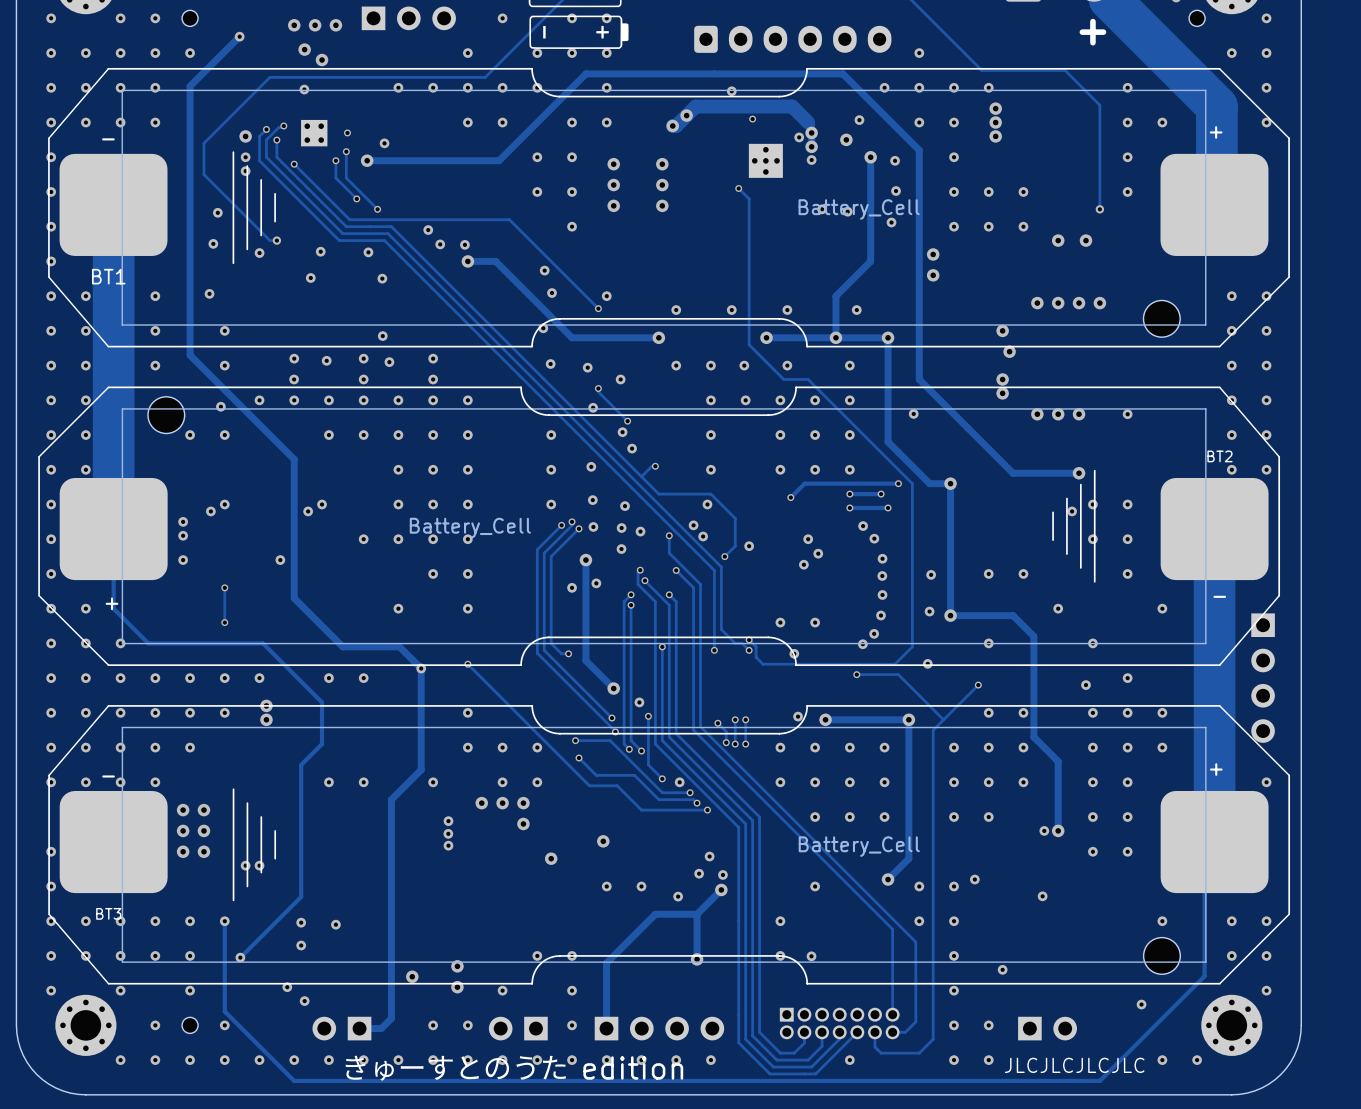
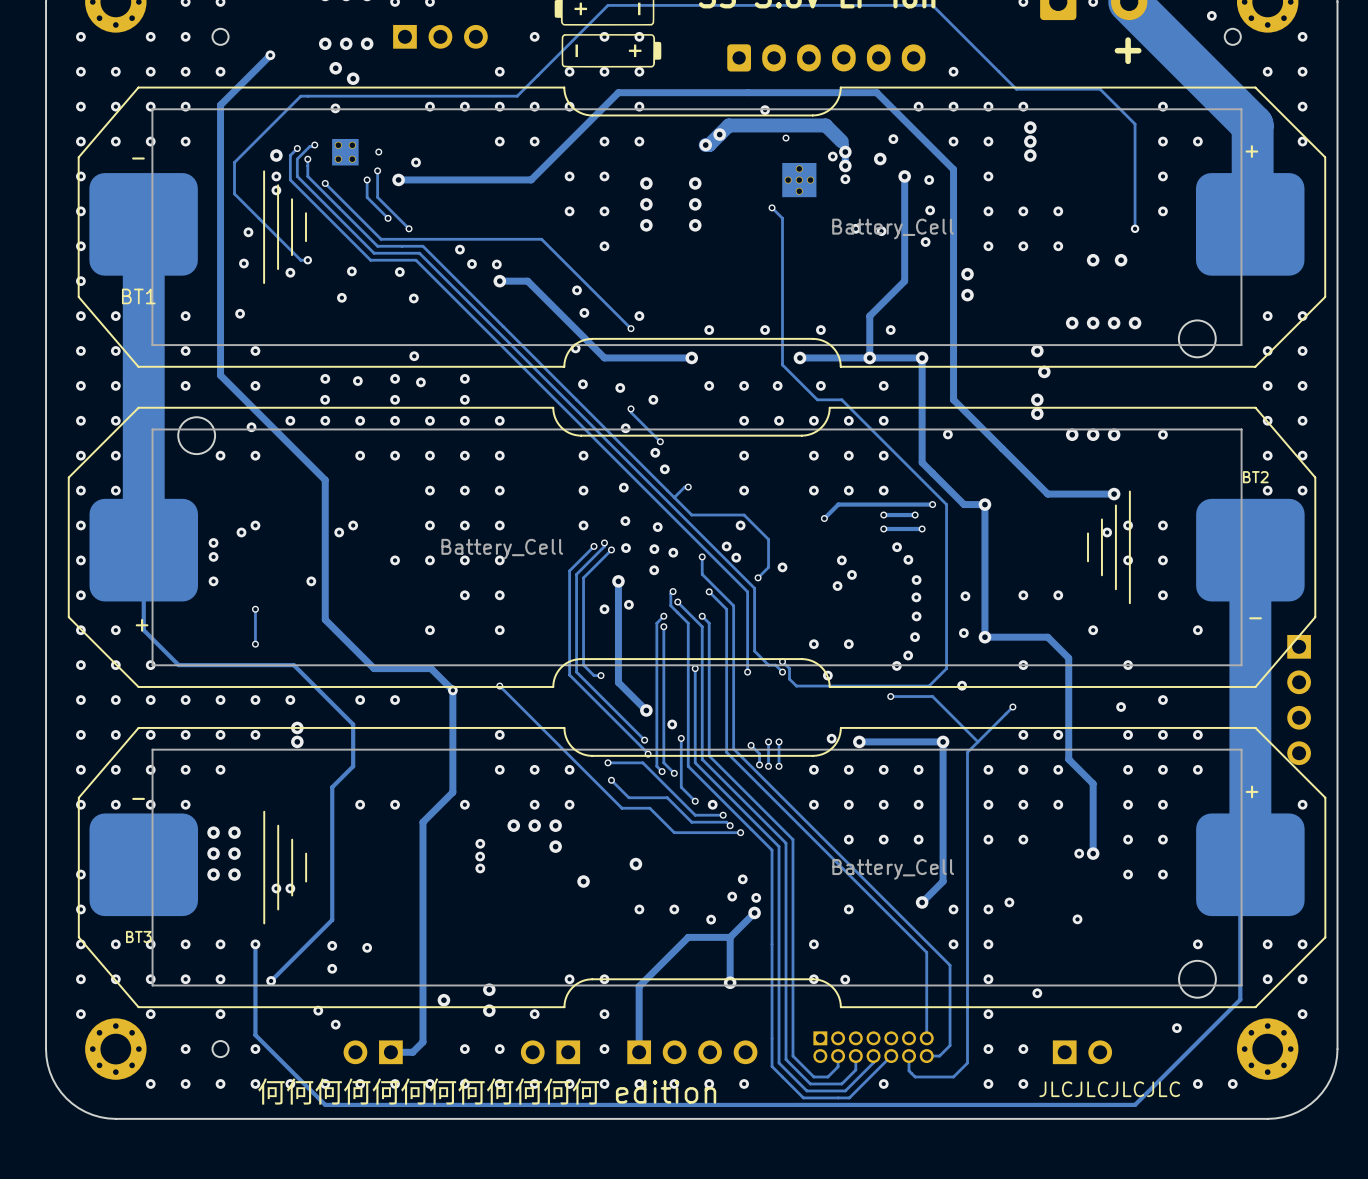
text: none -> 何何何何何何何何何何何何 (428, 1091)
text: きゅーすとのうた (455, 1068) -> none

